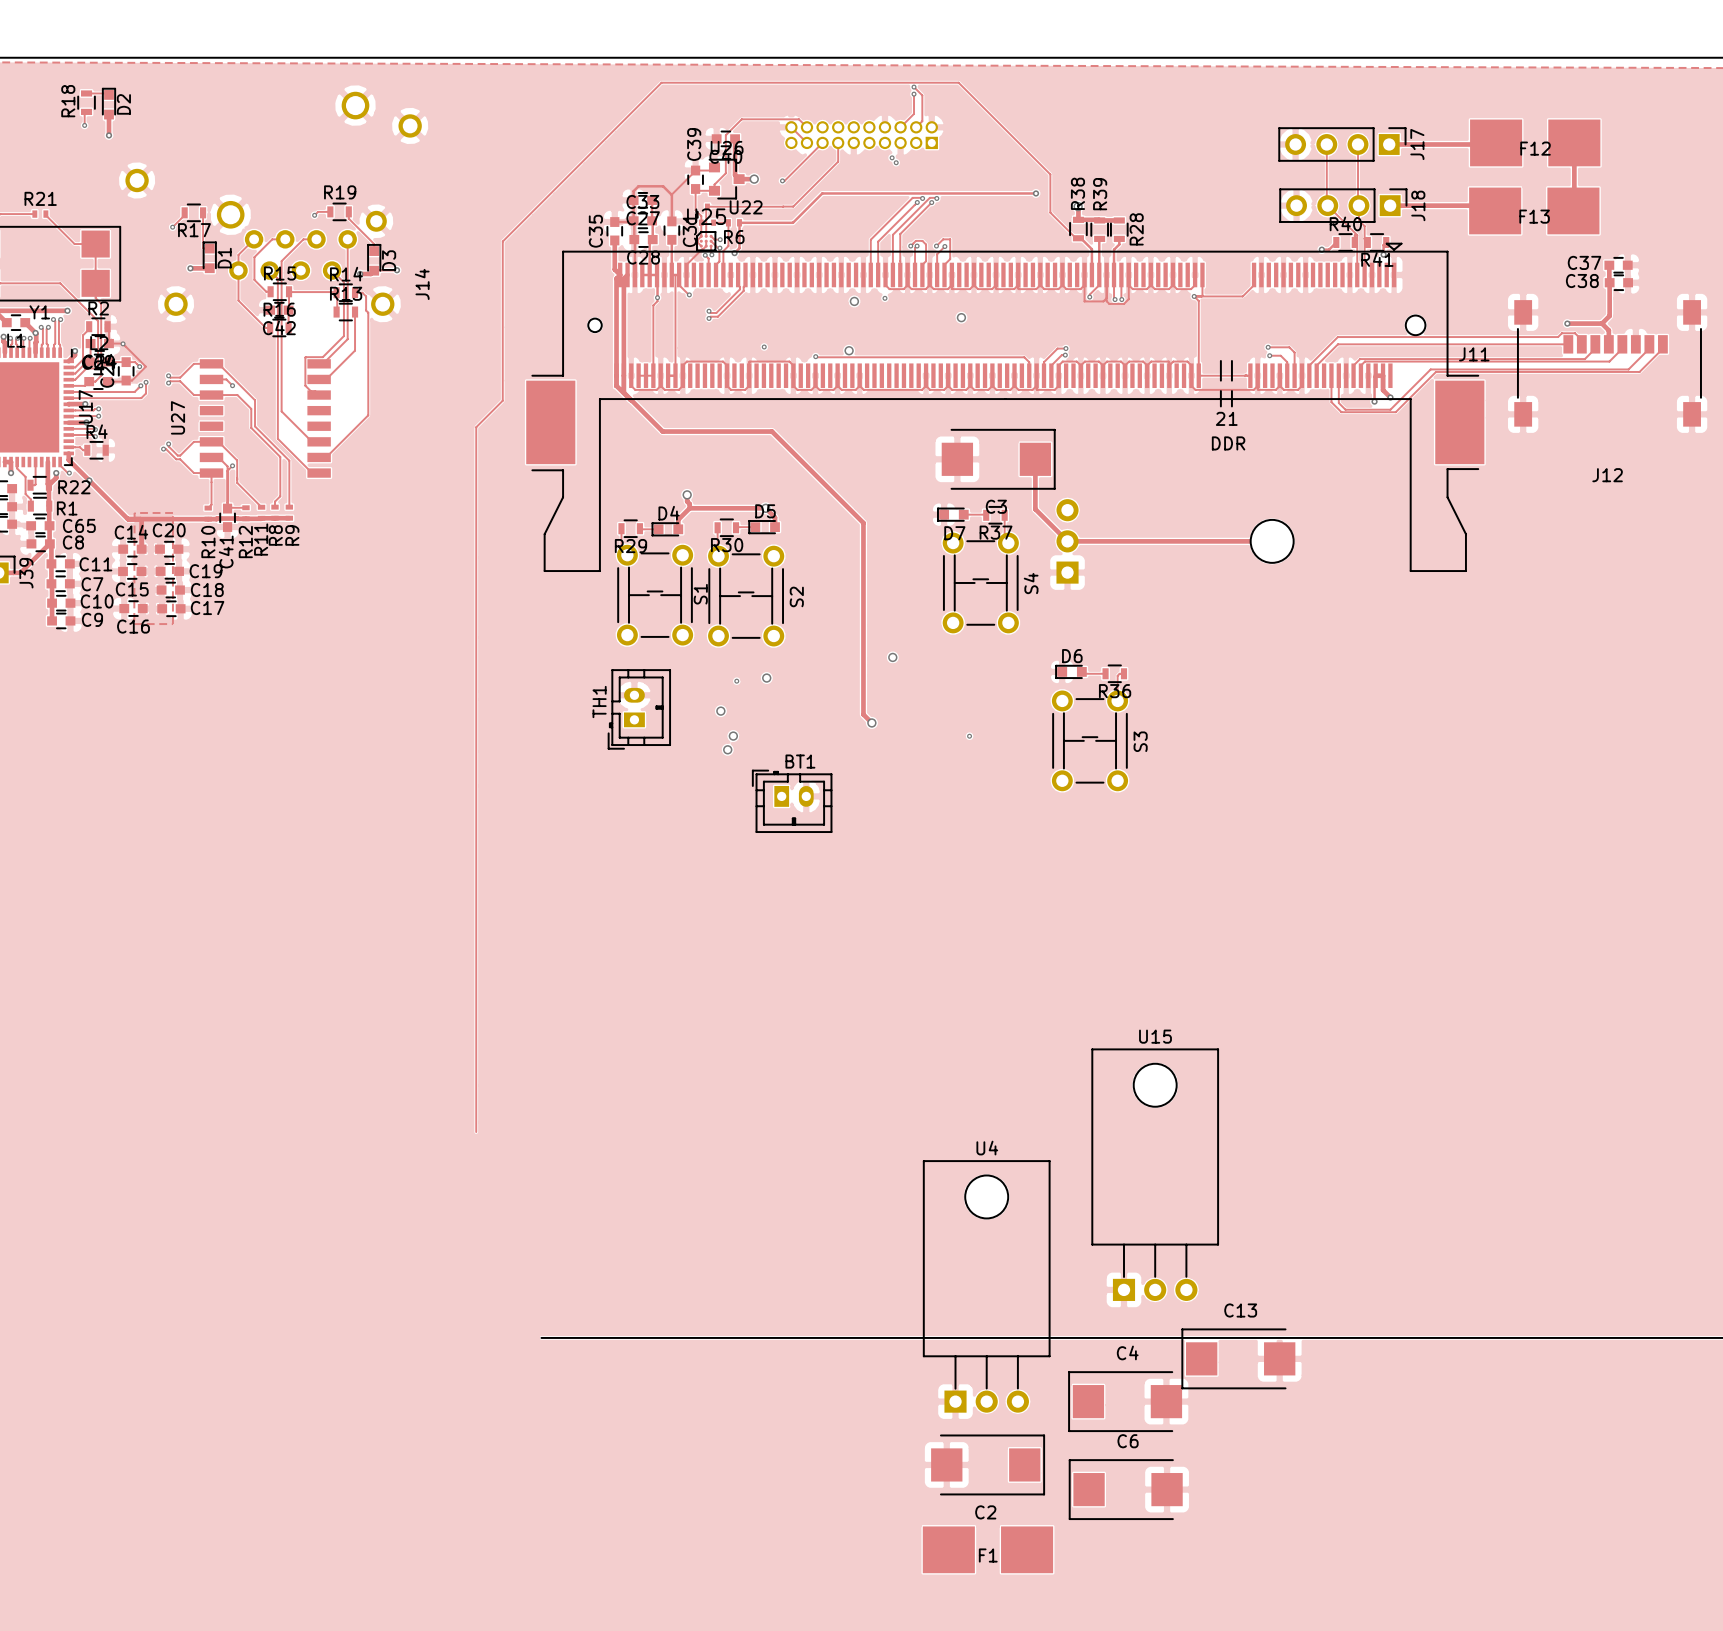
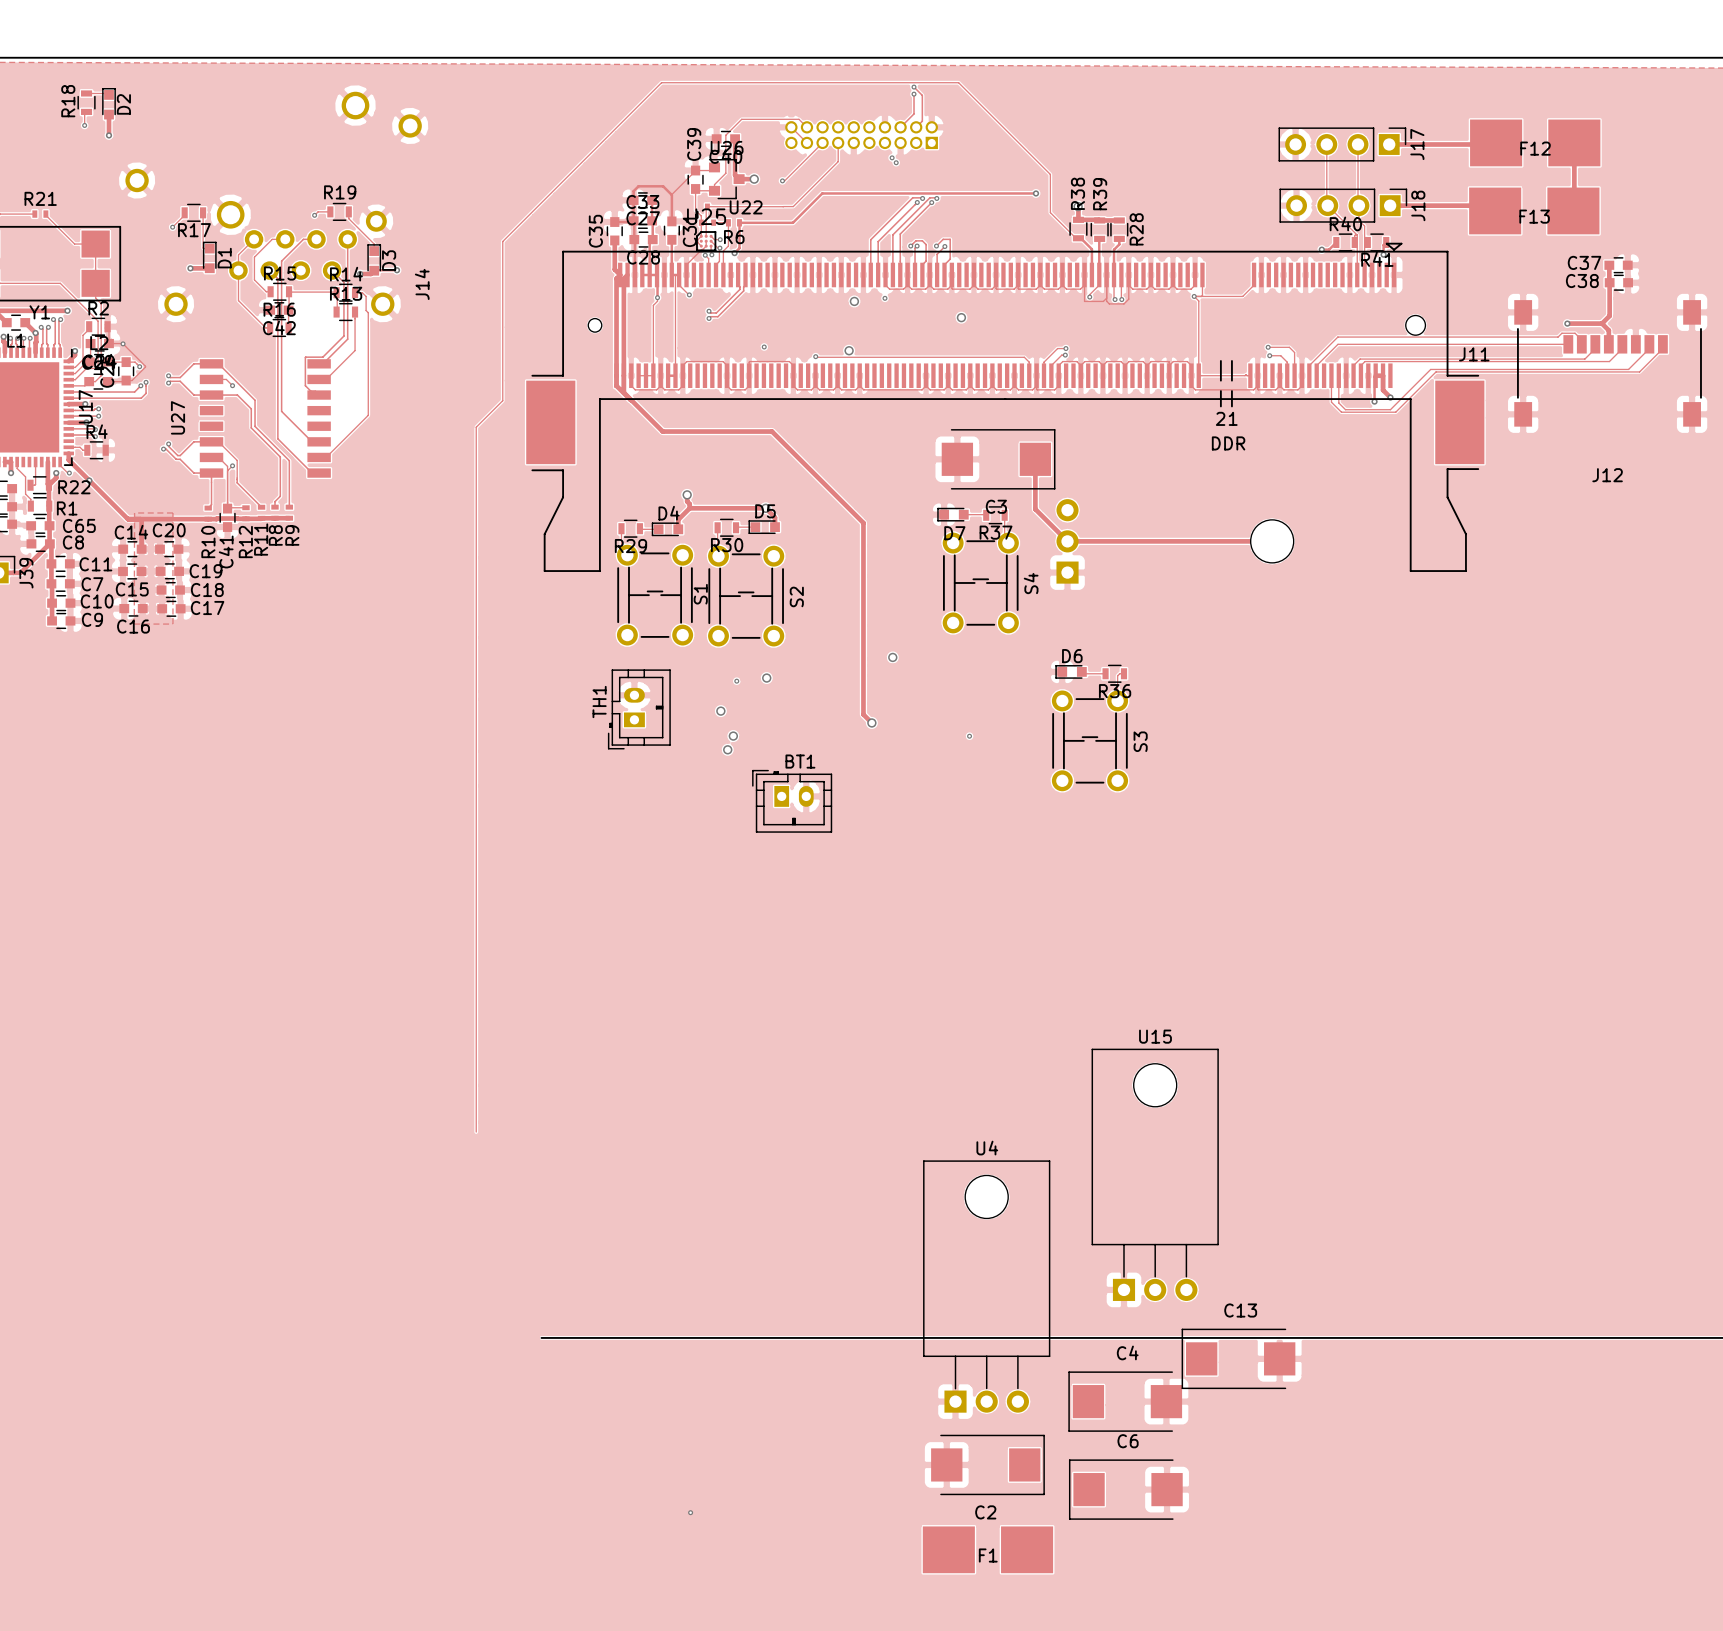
via: none -> (690, 1512)

